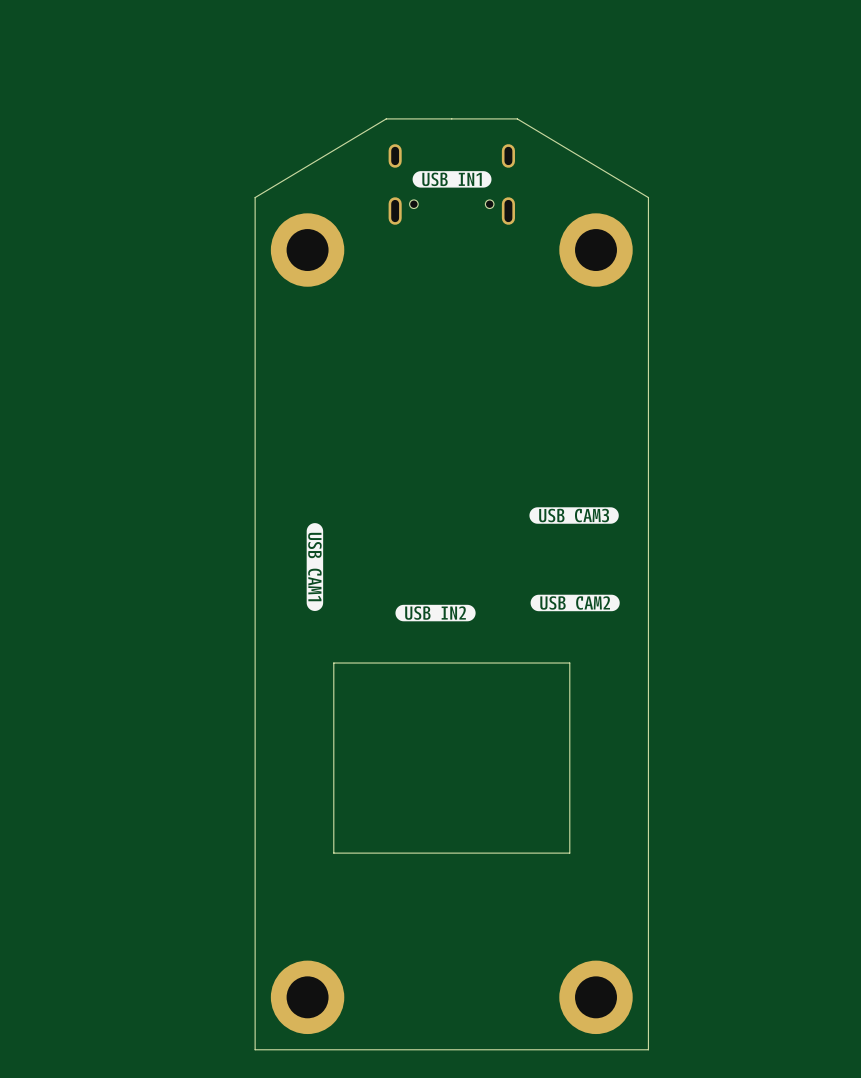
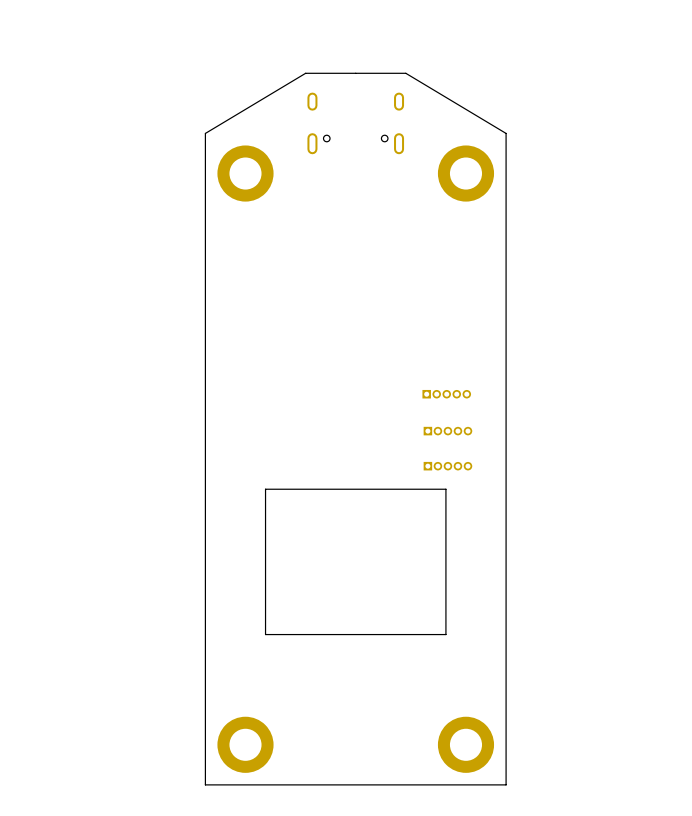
drawing: [412, 171, 492, 188] -> none
drawing: [529, 507, 619, 524] -> none
drawing: [306, 523, 324, 611] -> none
part: none -> (446, 394)
part: none -> (447, 431)
drawing: [530, 594, 620, 612] -> none
drawing: [395, 604, 476, 622] -> none
part: none -> (447, 466)

